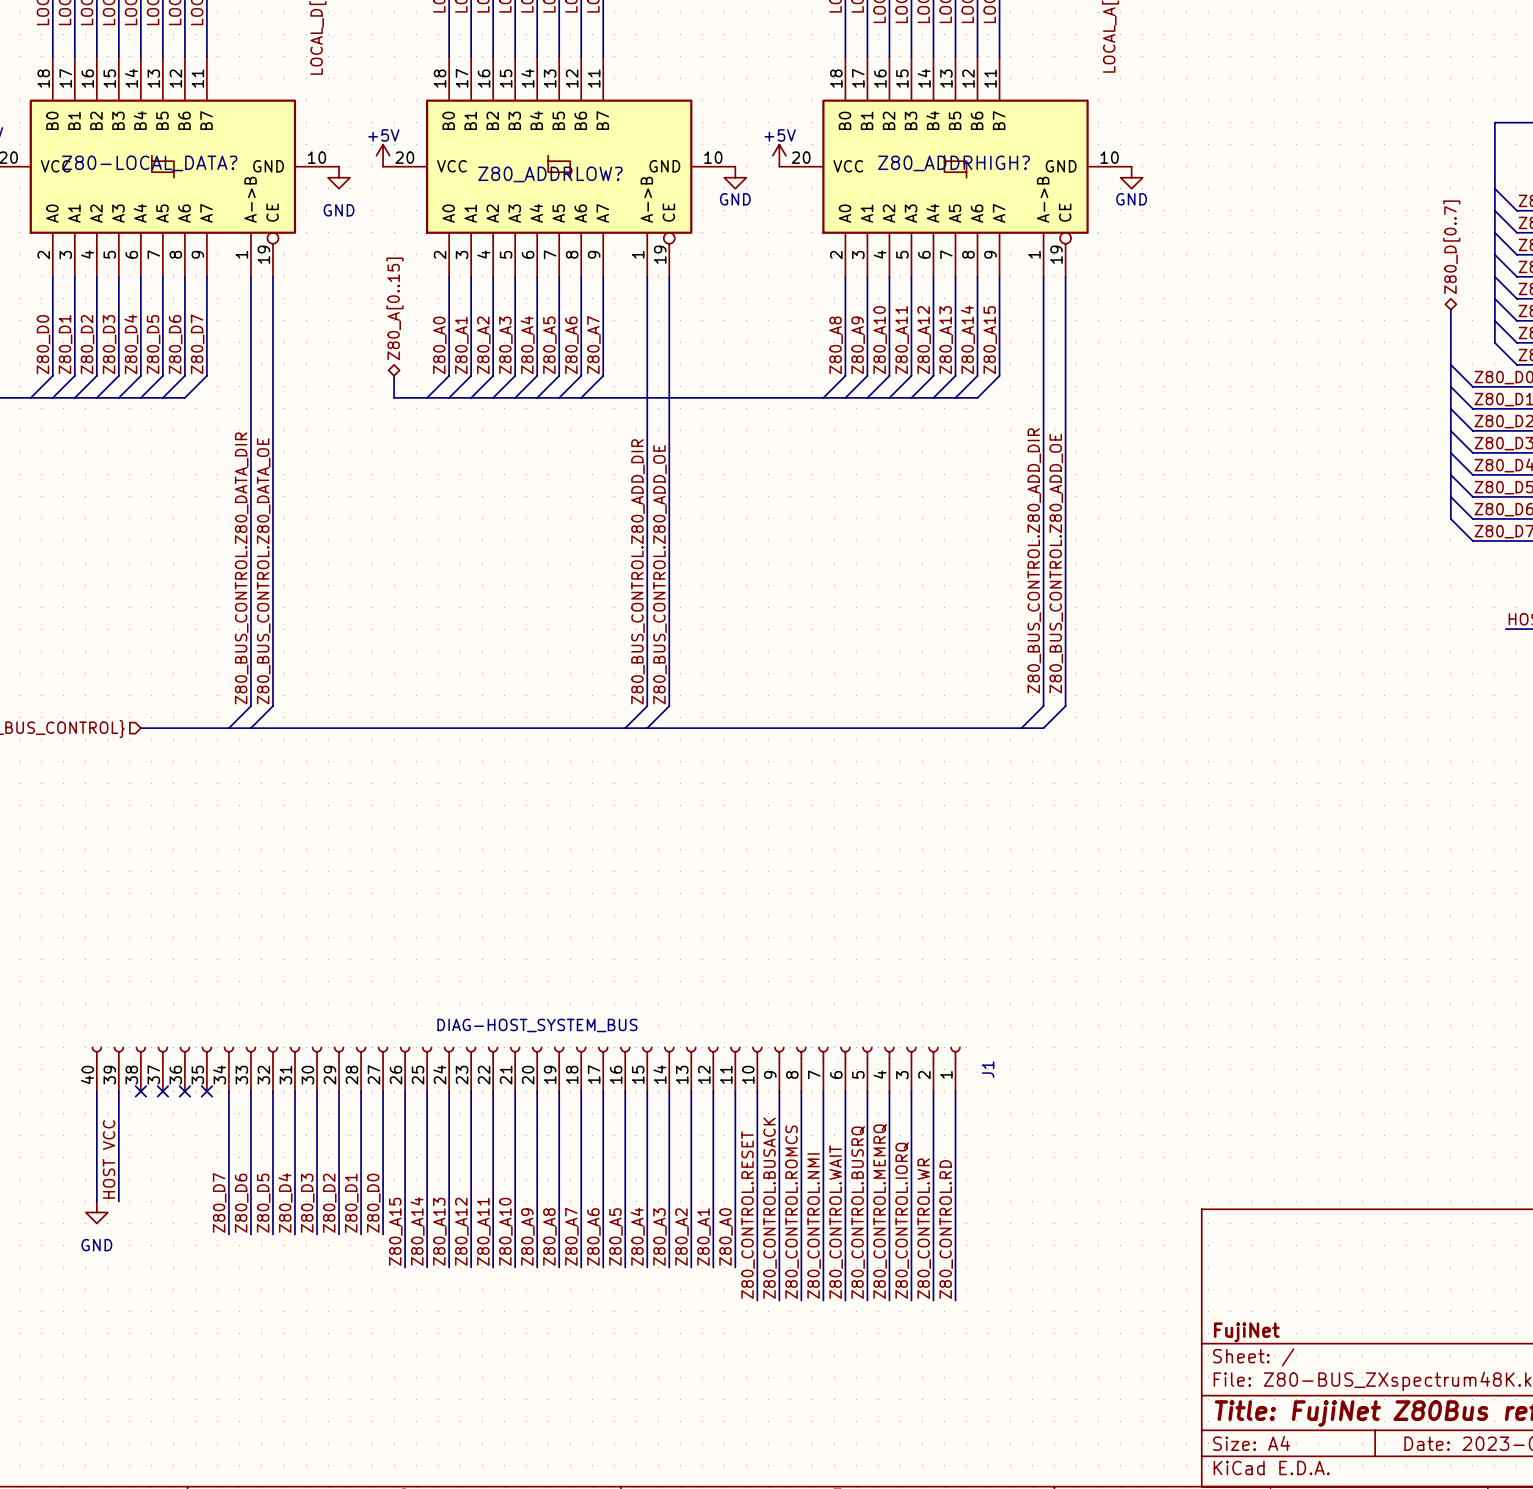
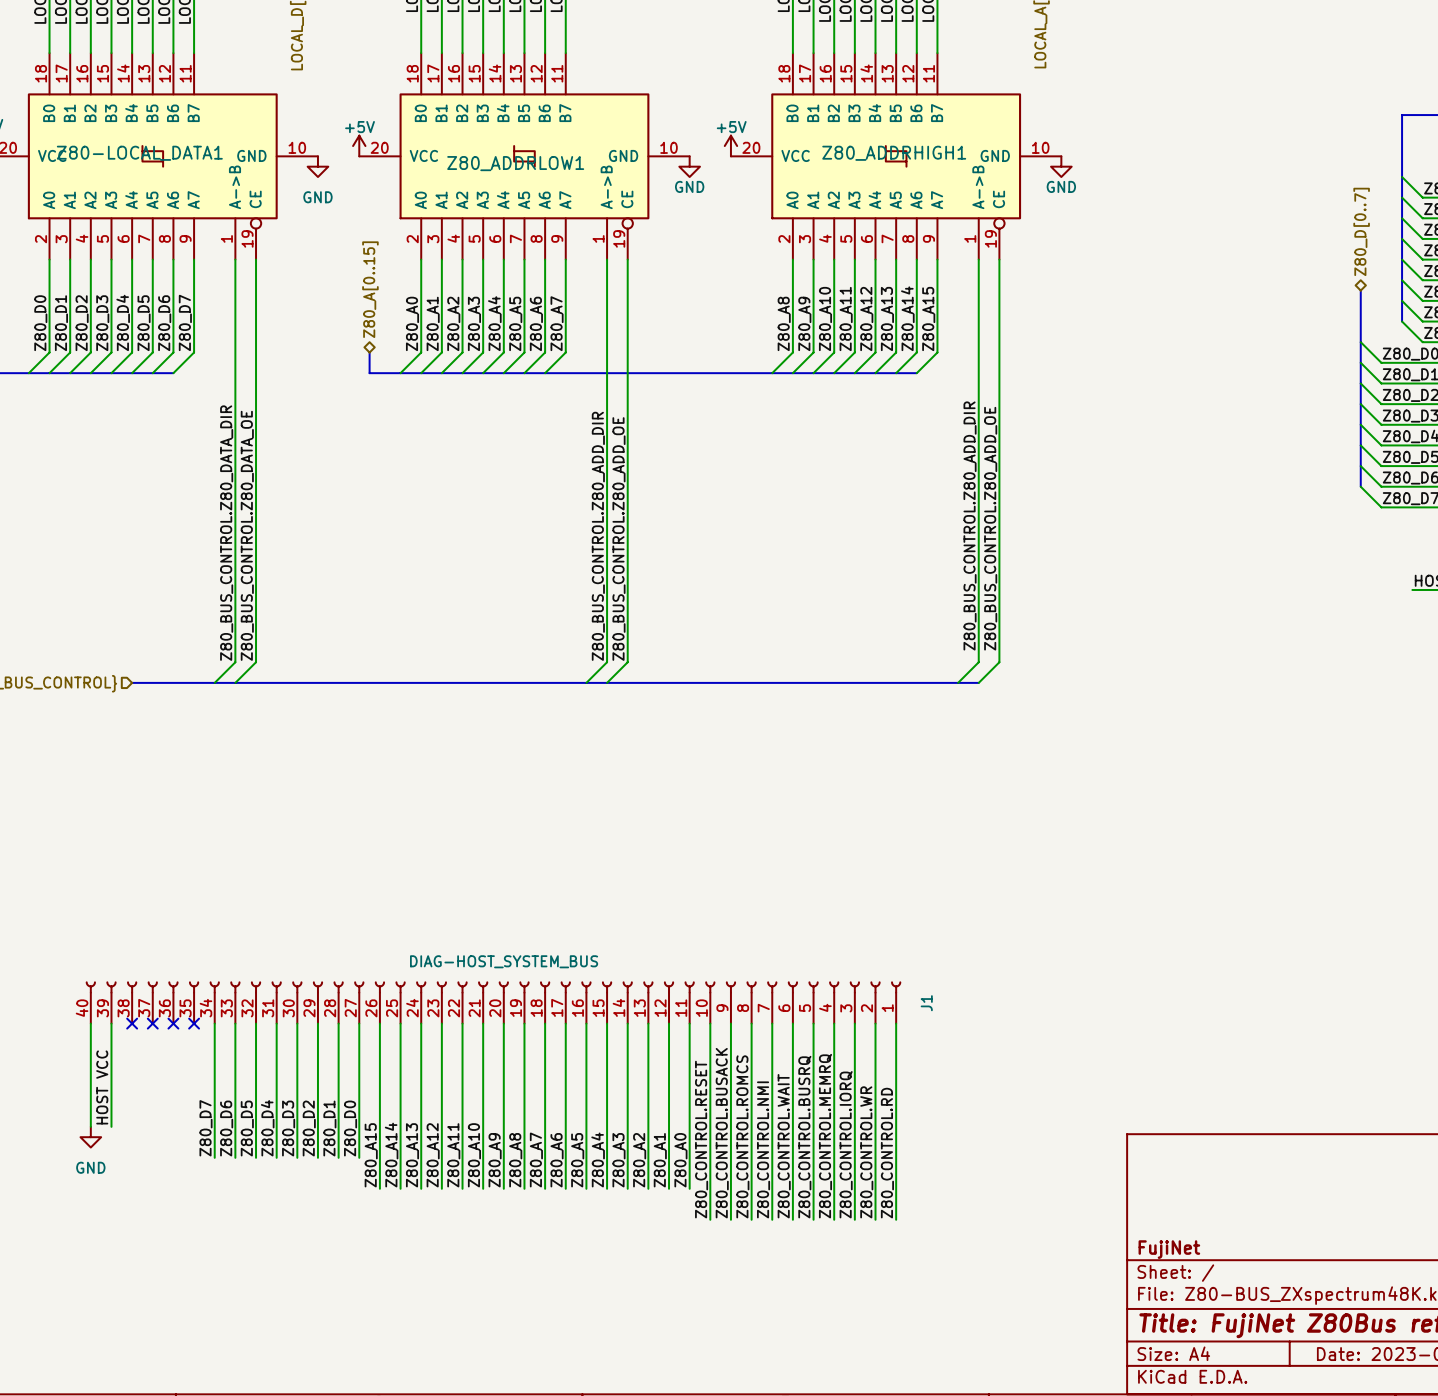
Z80-LOCAL_DATA? name: Z80-LOCAL_DATA? (149, 163) -> Z80-LOCAL_DATA1 (139, 153)
Z80_ADDRHIGH? name: Z80_ADDRHIGH? (954, 163) -> Z80_ADDRHIGH1 (894, 153)
Z80_ADDRLOW? name: Z80_ADDRLOW? (550, 174) -> Z80_ADDRLOW1 (515, 163)

